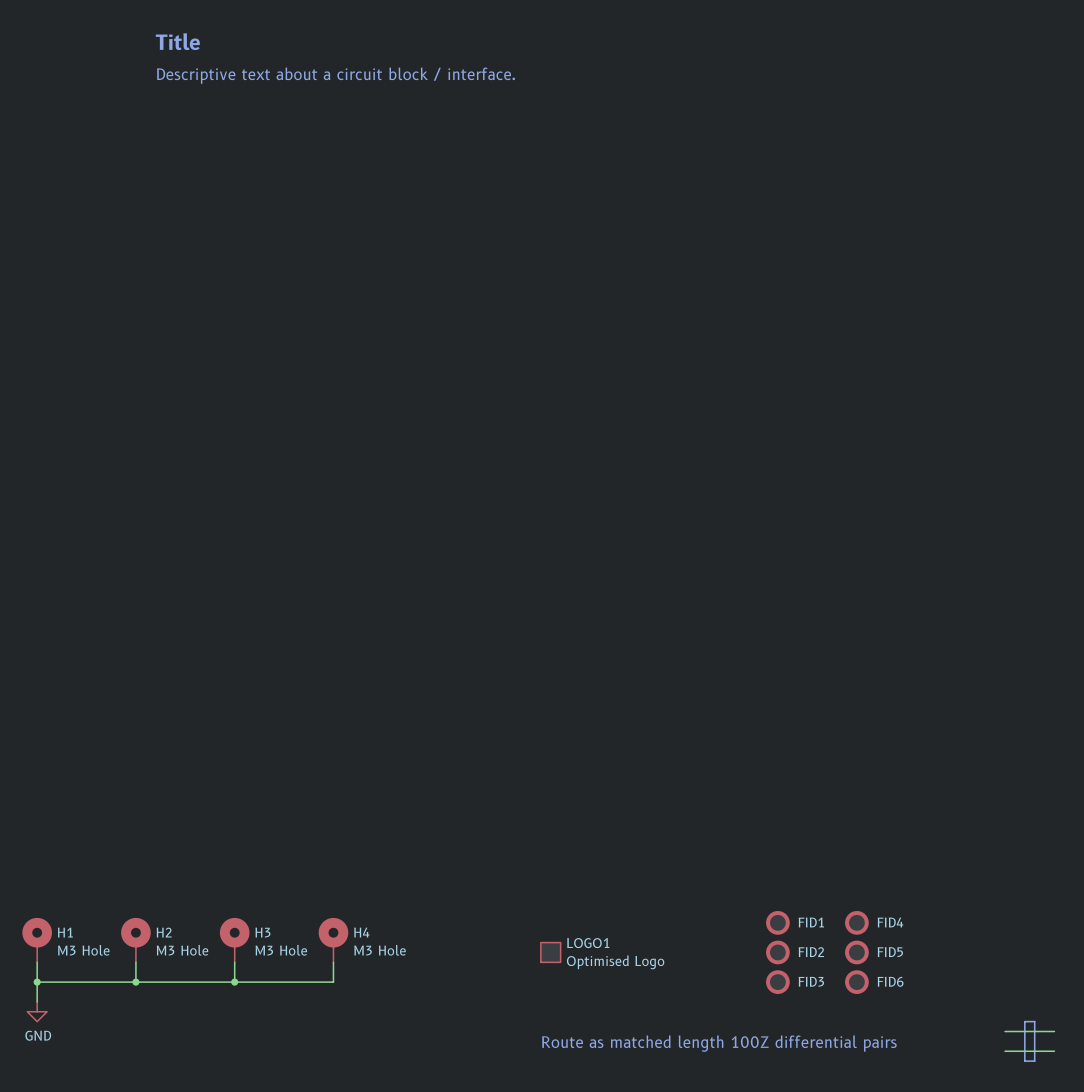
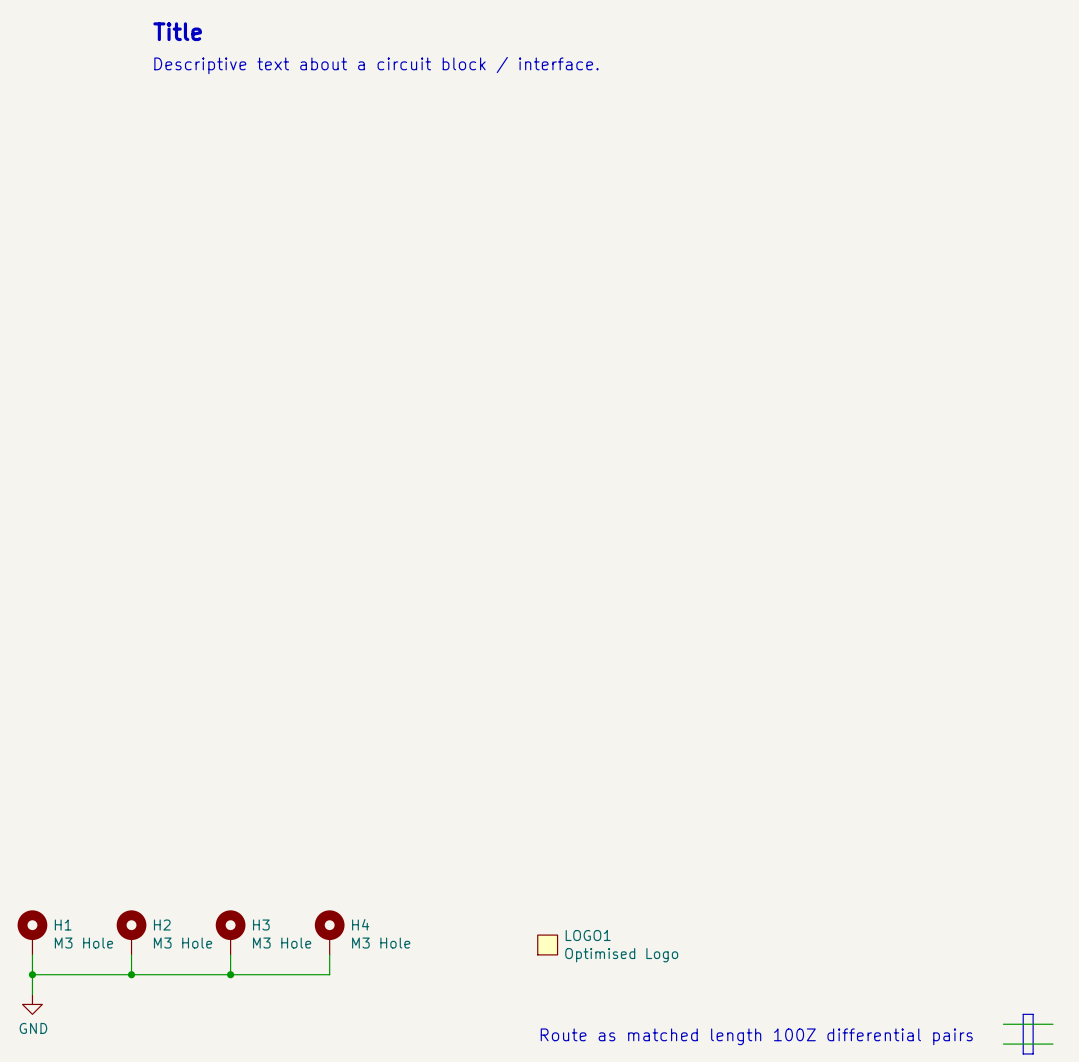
FID1: (777, 922) -> none
FID4: (856, 922) -> none
FID2: (777, 952) -> none
FID5: (856, 952) -> none
FID3: (777, 982) -> none
FID6: (856, 982) -> none

